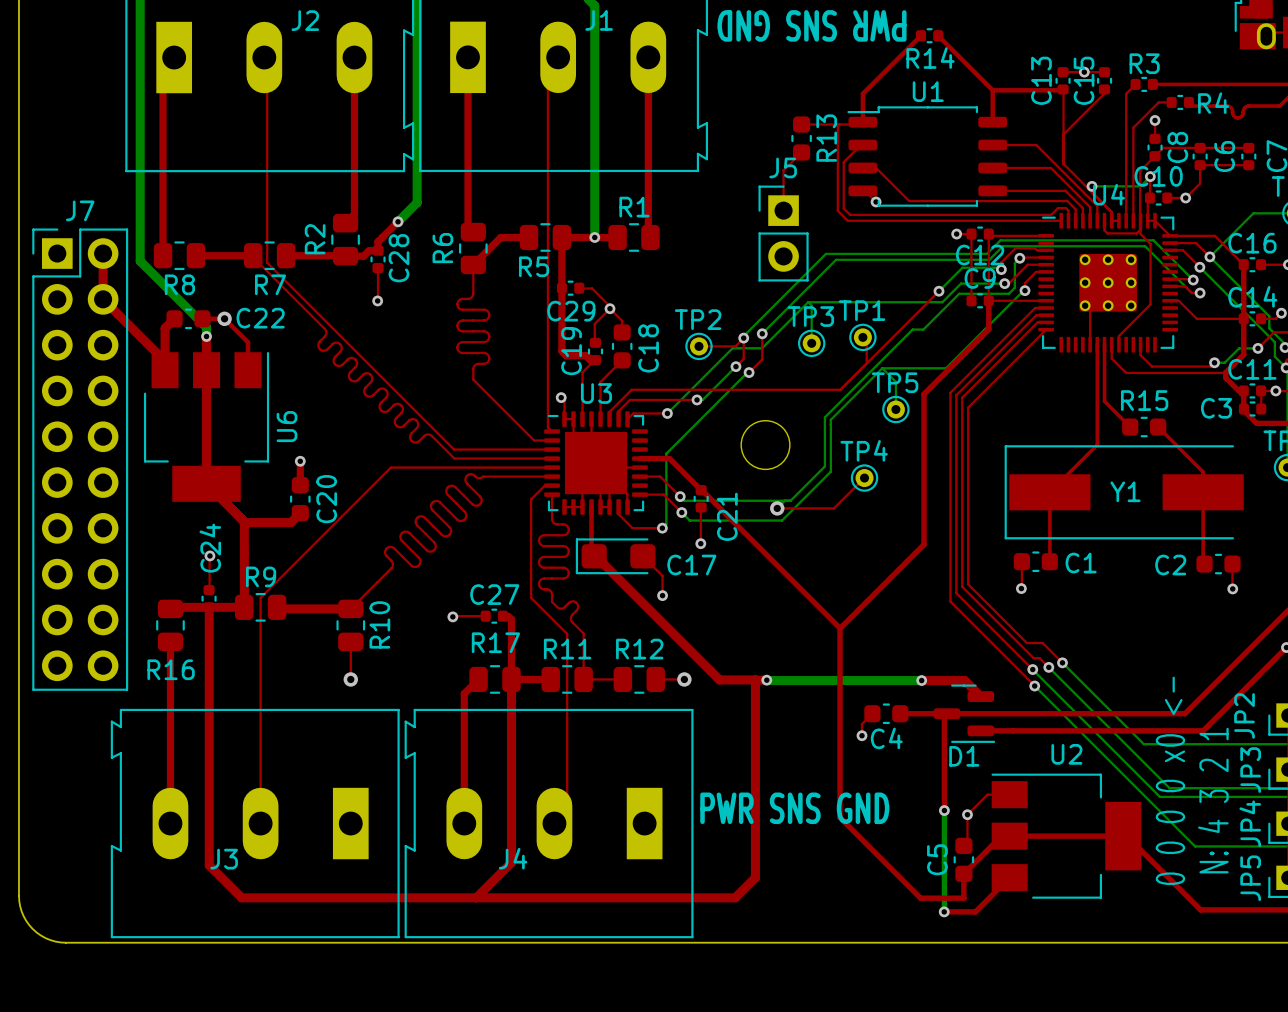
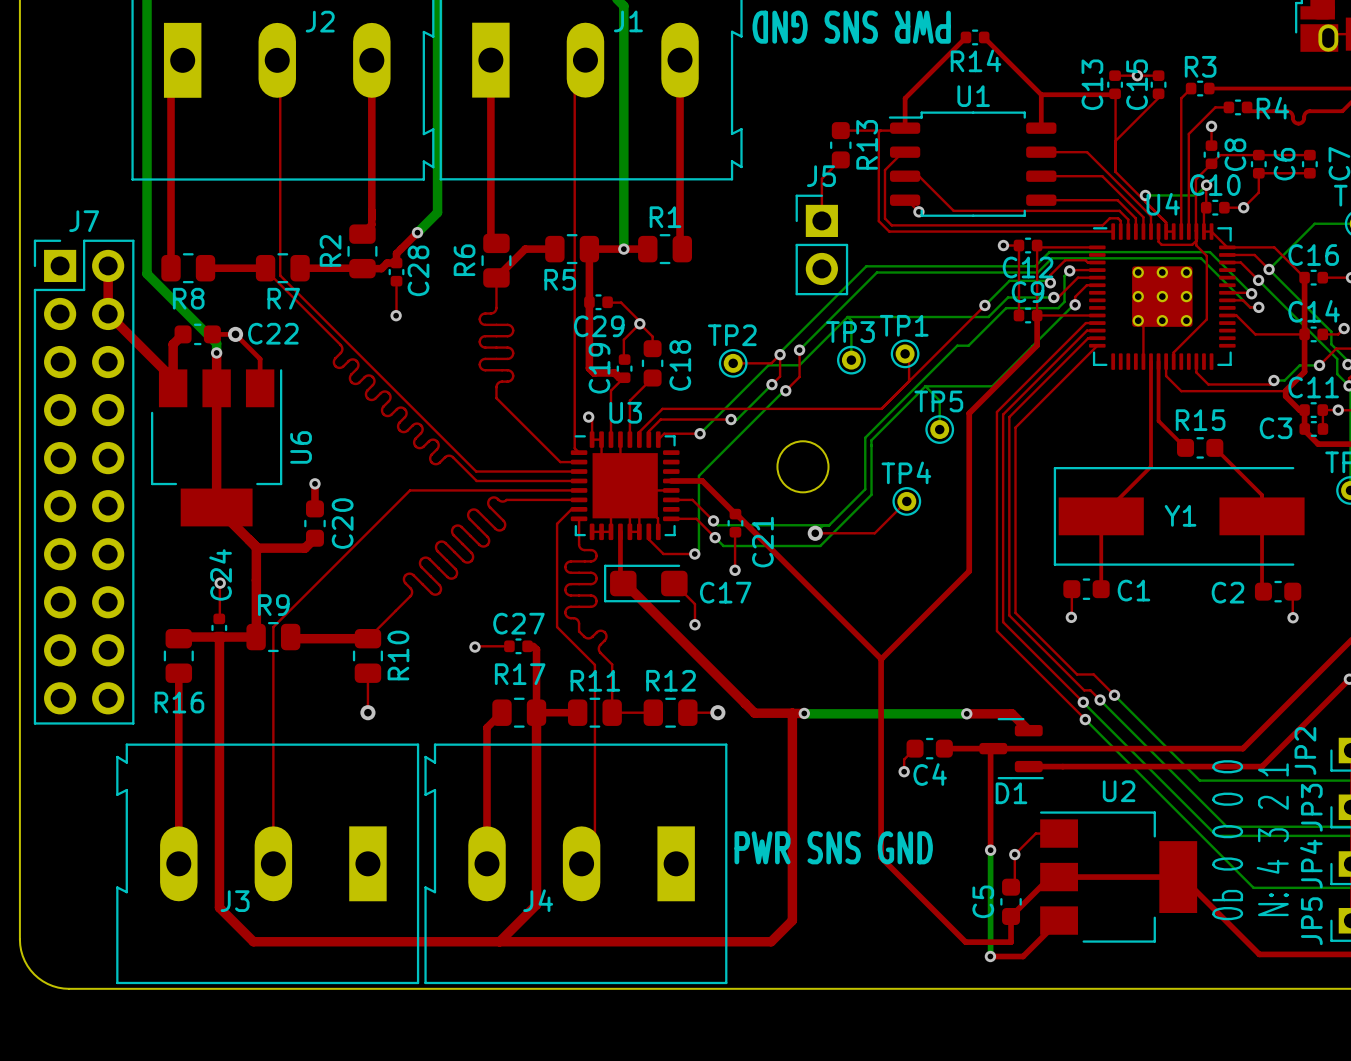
text: 0 0 0 0 x0 <- (1170, 780) -> 0b 0 0 0 0 (1227, 840)

